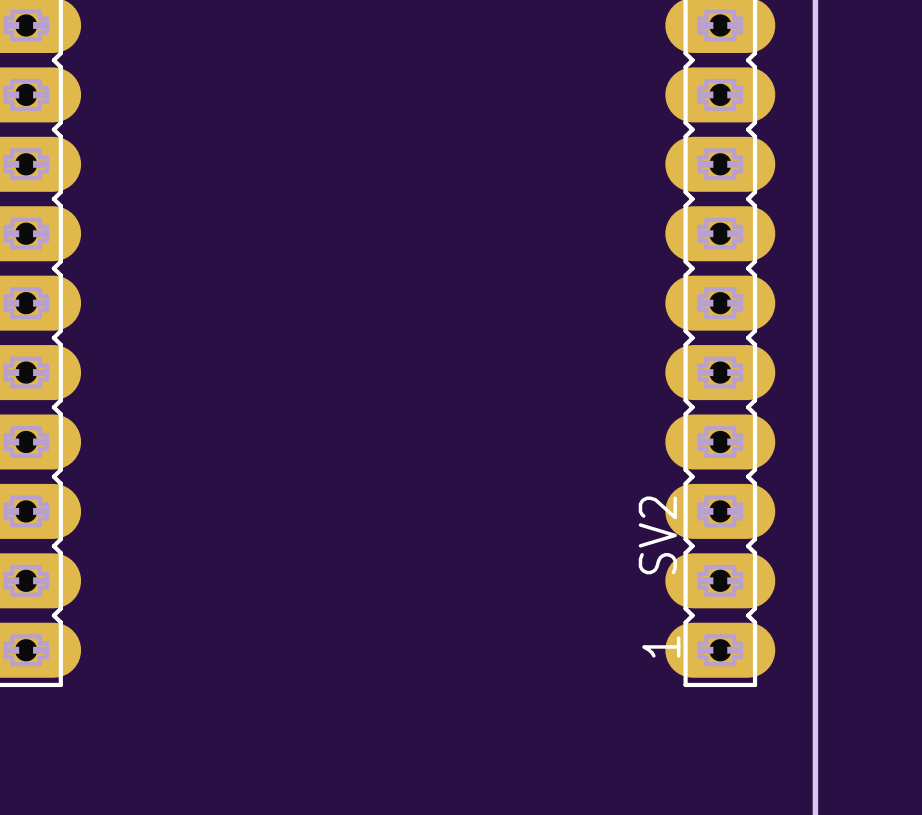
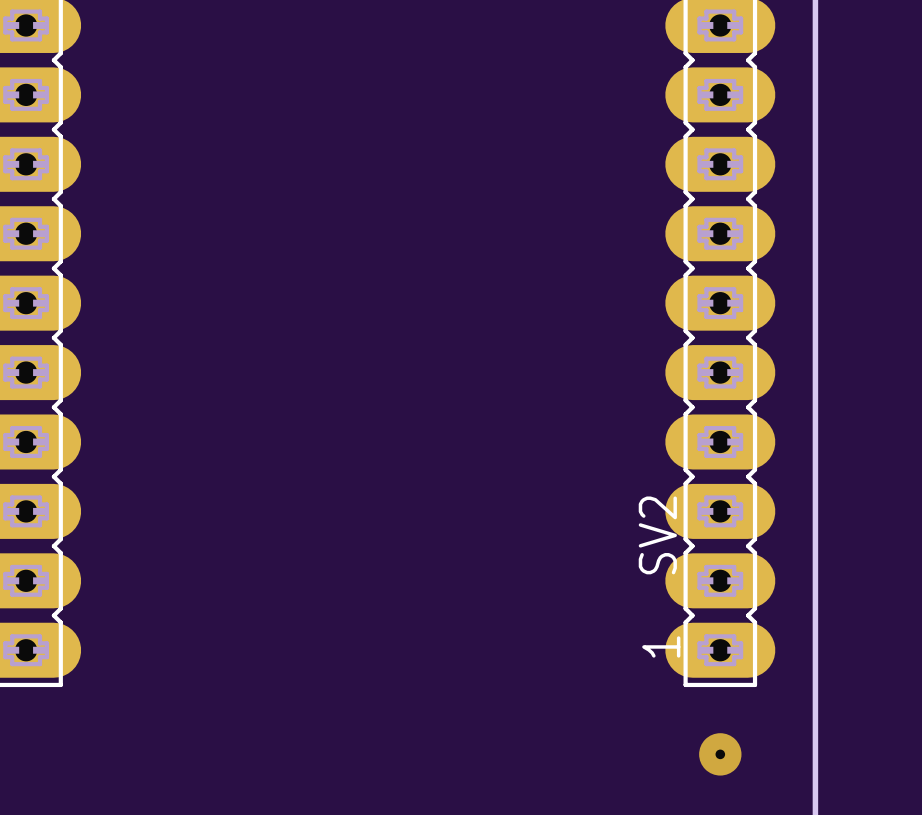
via: none -> (720, 754)

